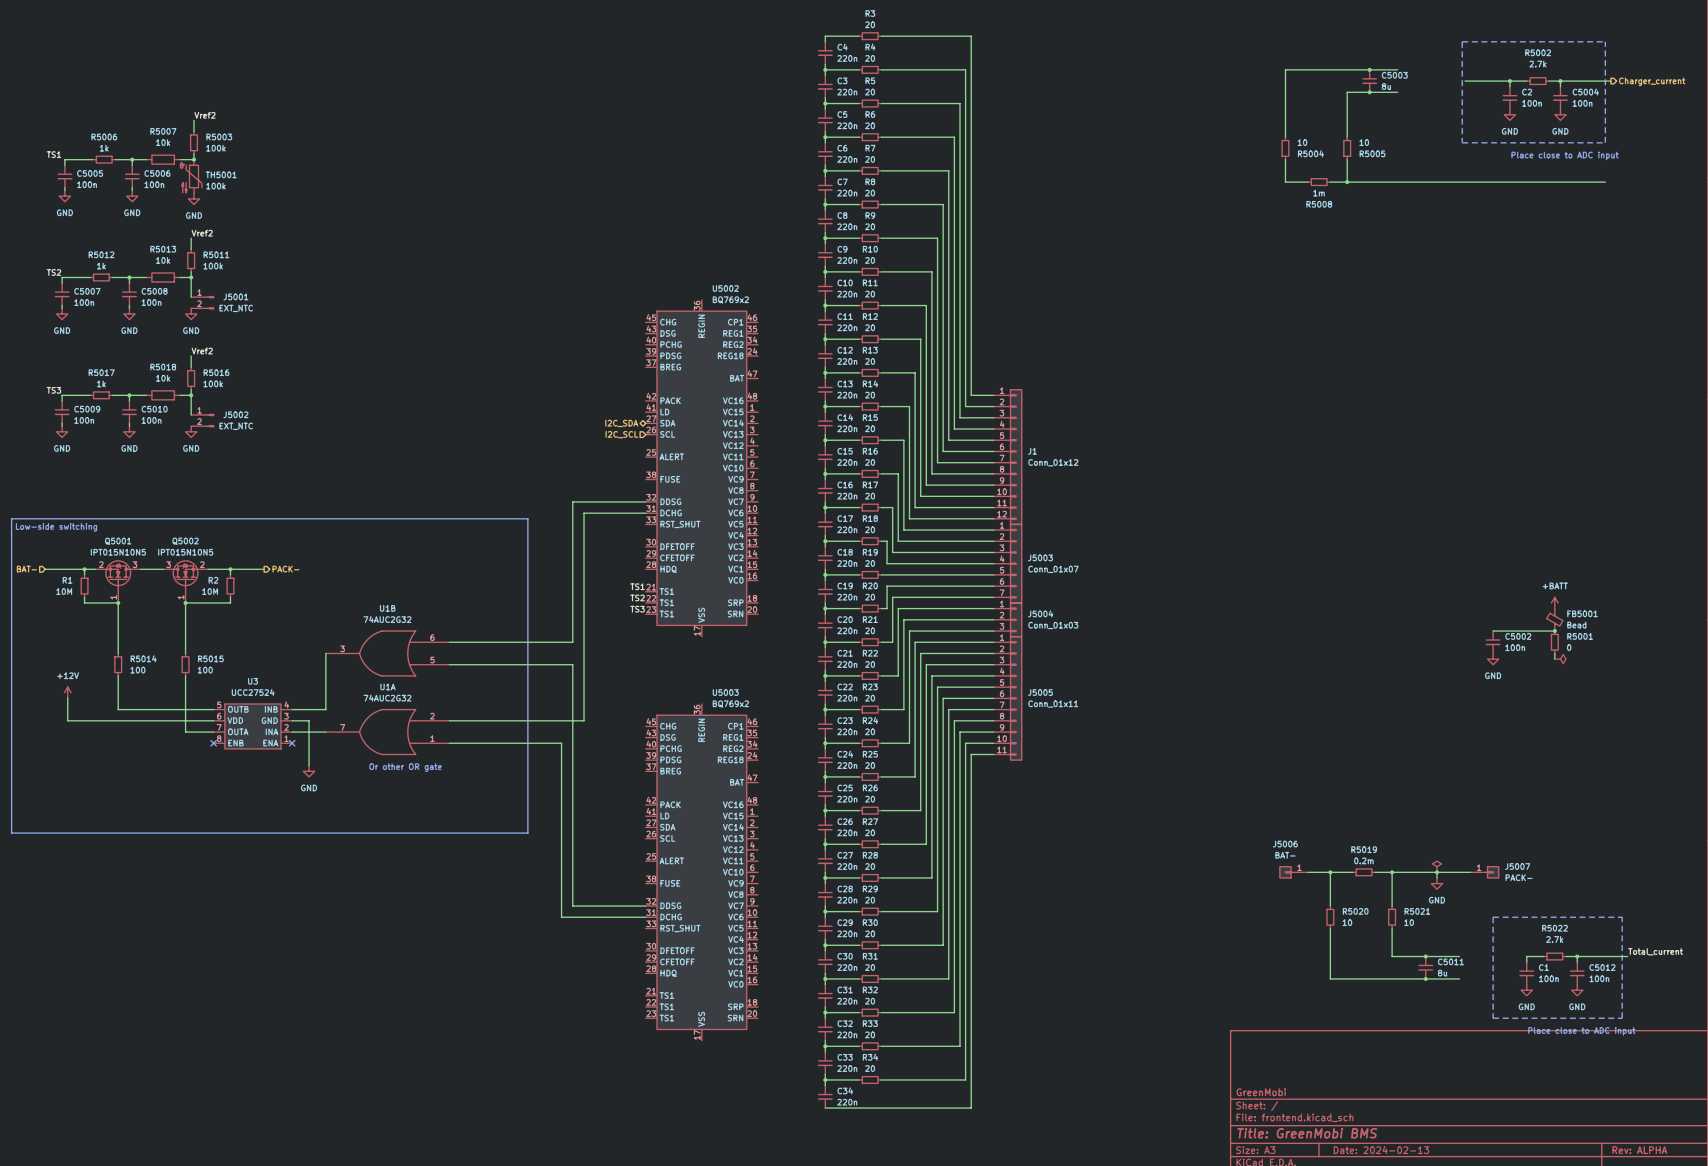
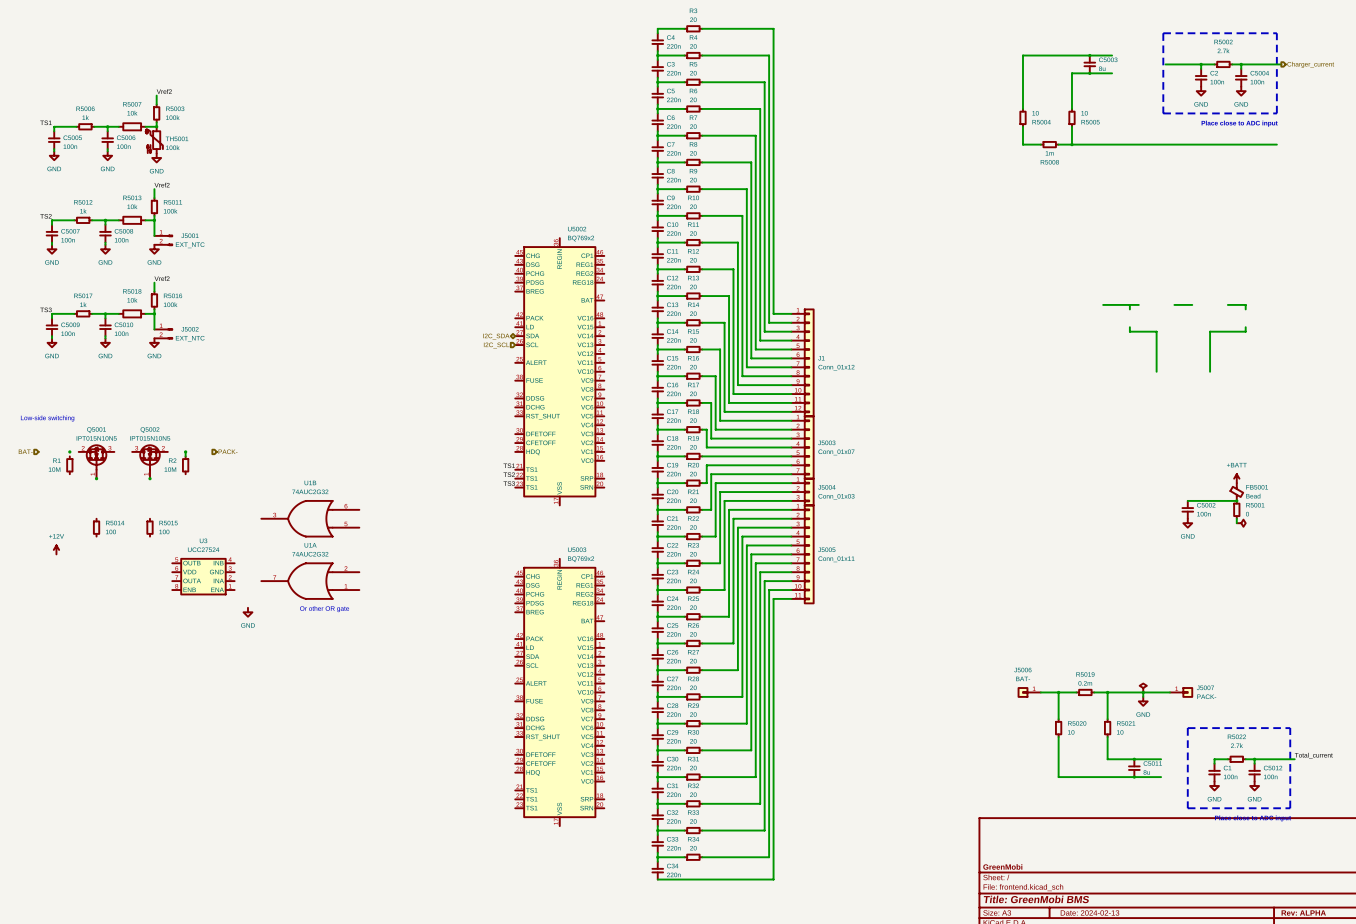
wire: none -> (1103, 304) (1138, 304)
wire: none -> (1129, 304) (1129, 309)
wire: none -> (1174, 304) (1192, 304)
wire: none -> (1227, 304) (1245, 304) (1245, 309)
wire: none -> (1129, 327) (1129, 331) (1156, 331) (1156, 371)
wire: none -> (1245, 327) (1245, 331) (1210, 331) (1210, 371)
wire: (645, 501) (572, 501) (572, 642) (449, 642) -> none
wire: (645, 513) (584, 513) (584, 720) (449, 720) -> none
line: (11, 518) (527, 518) (527, 833) (11, 833) (11, 518) -> none
wire: (45, 569) (95, 569) -> none
wire: (84, 569) (84, 574) -> none
wire: (140, 569) (163, 569) -> none
wire: (208, 569) (264, 569) -> none
wire: (84, 597) (84, 602) (118, 602) (118, 653) -> none
wire: (230, 597) (230, 602) (185, 602) (185, 653) -> none
wire: (325, 653) (325, 709) (292, 709) -> none
wire: (449, 664) (572, 664) (572, 906) (645, 906) -> none
wire: (118, 675) (118, 709) (213, 709) -> none
wire: (185, 675) (185, 732) (213, 732) -> none
wire: (67, 698) (67, 720) (213, 720) -> none
wire: (292, 720) (309, 720) (309, 765) -> none
wire: (292, 732) (325, 732) -> none
no-connect mark: (213, 743) -> none
no-connect mark: (292, 743) -> none
wire: (449, 743) (561, 743) (561, 917) (645, 917) -> none

